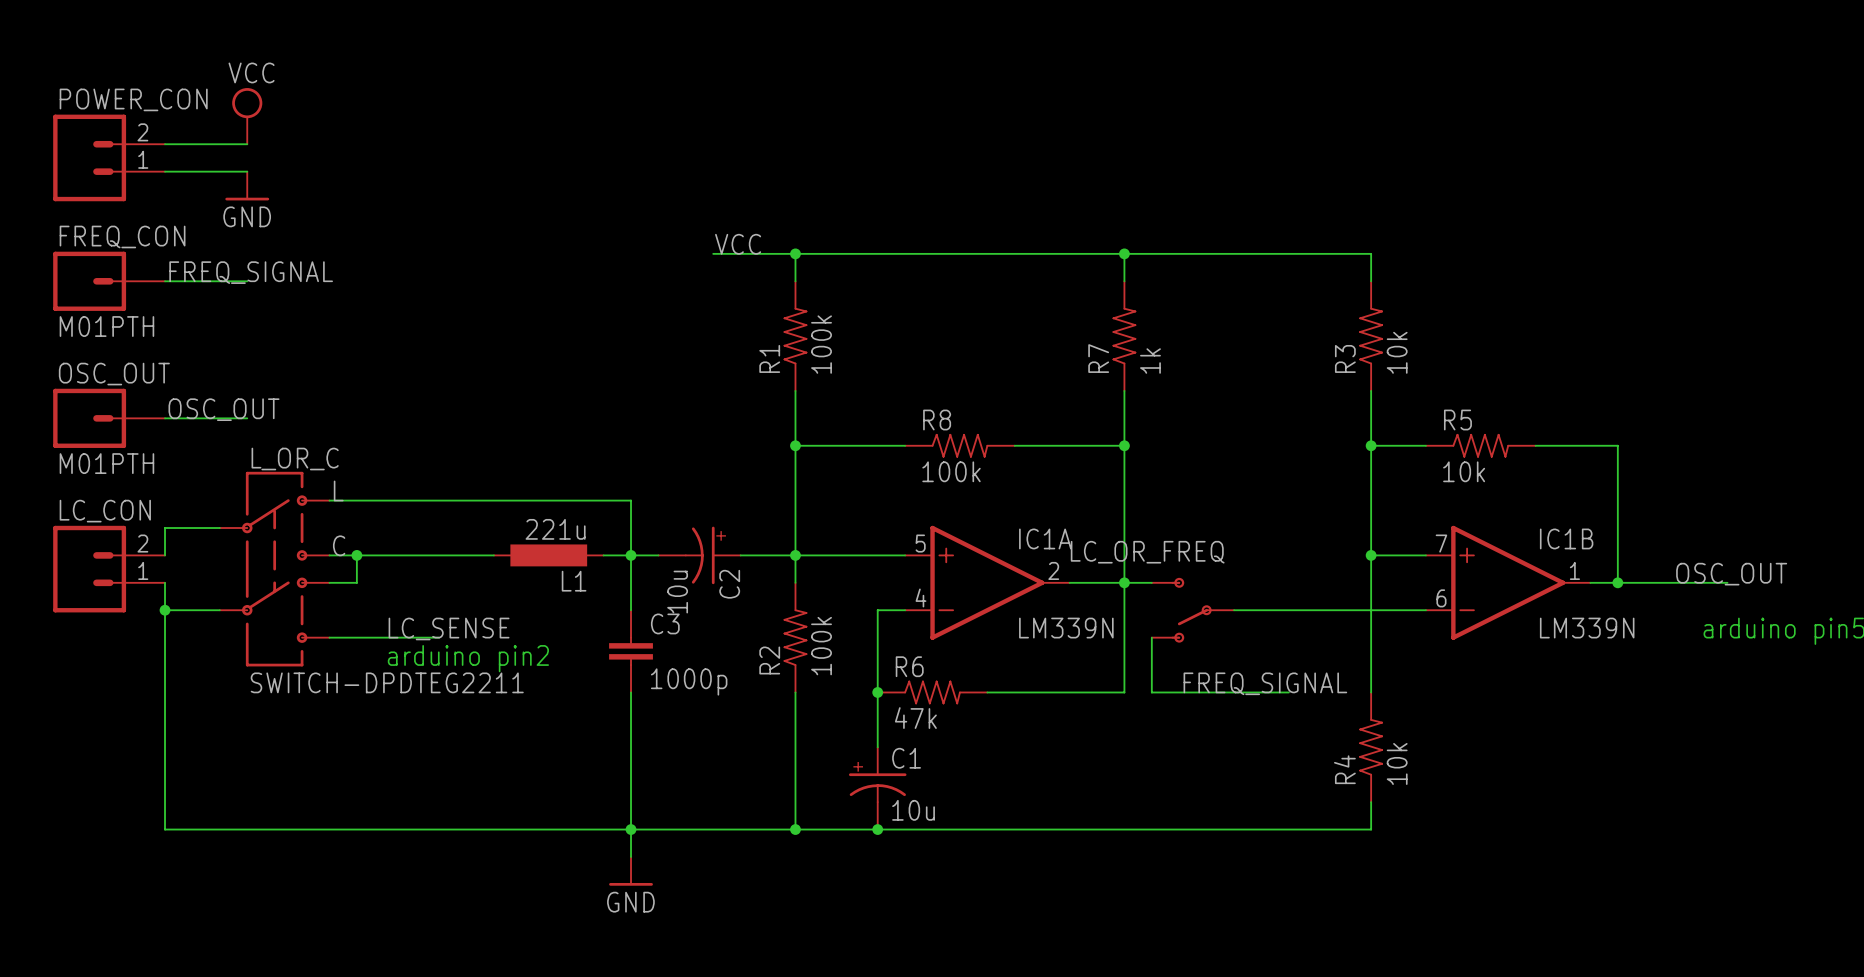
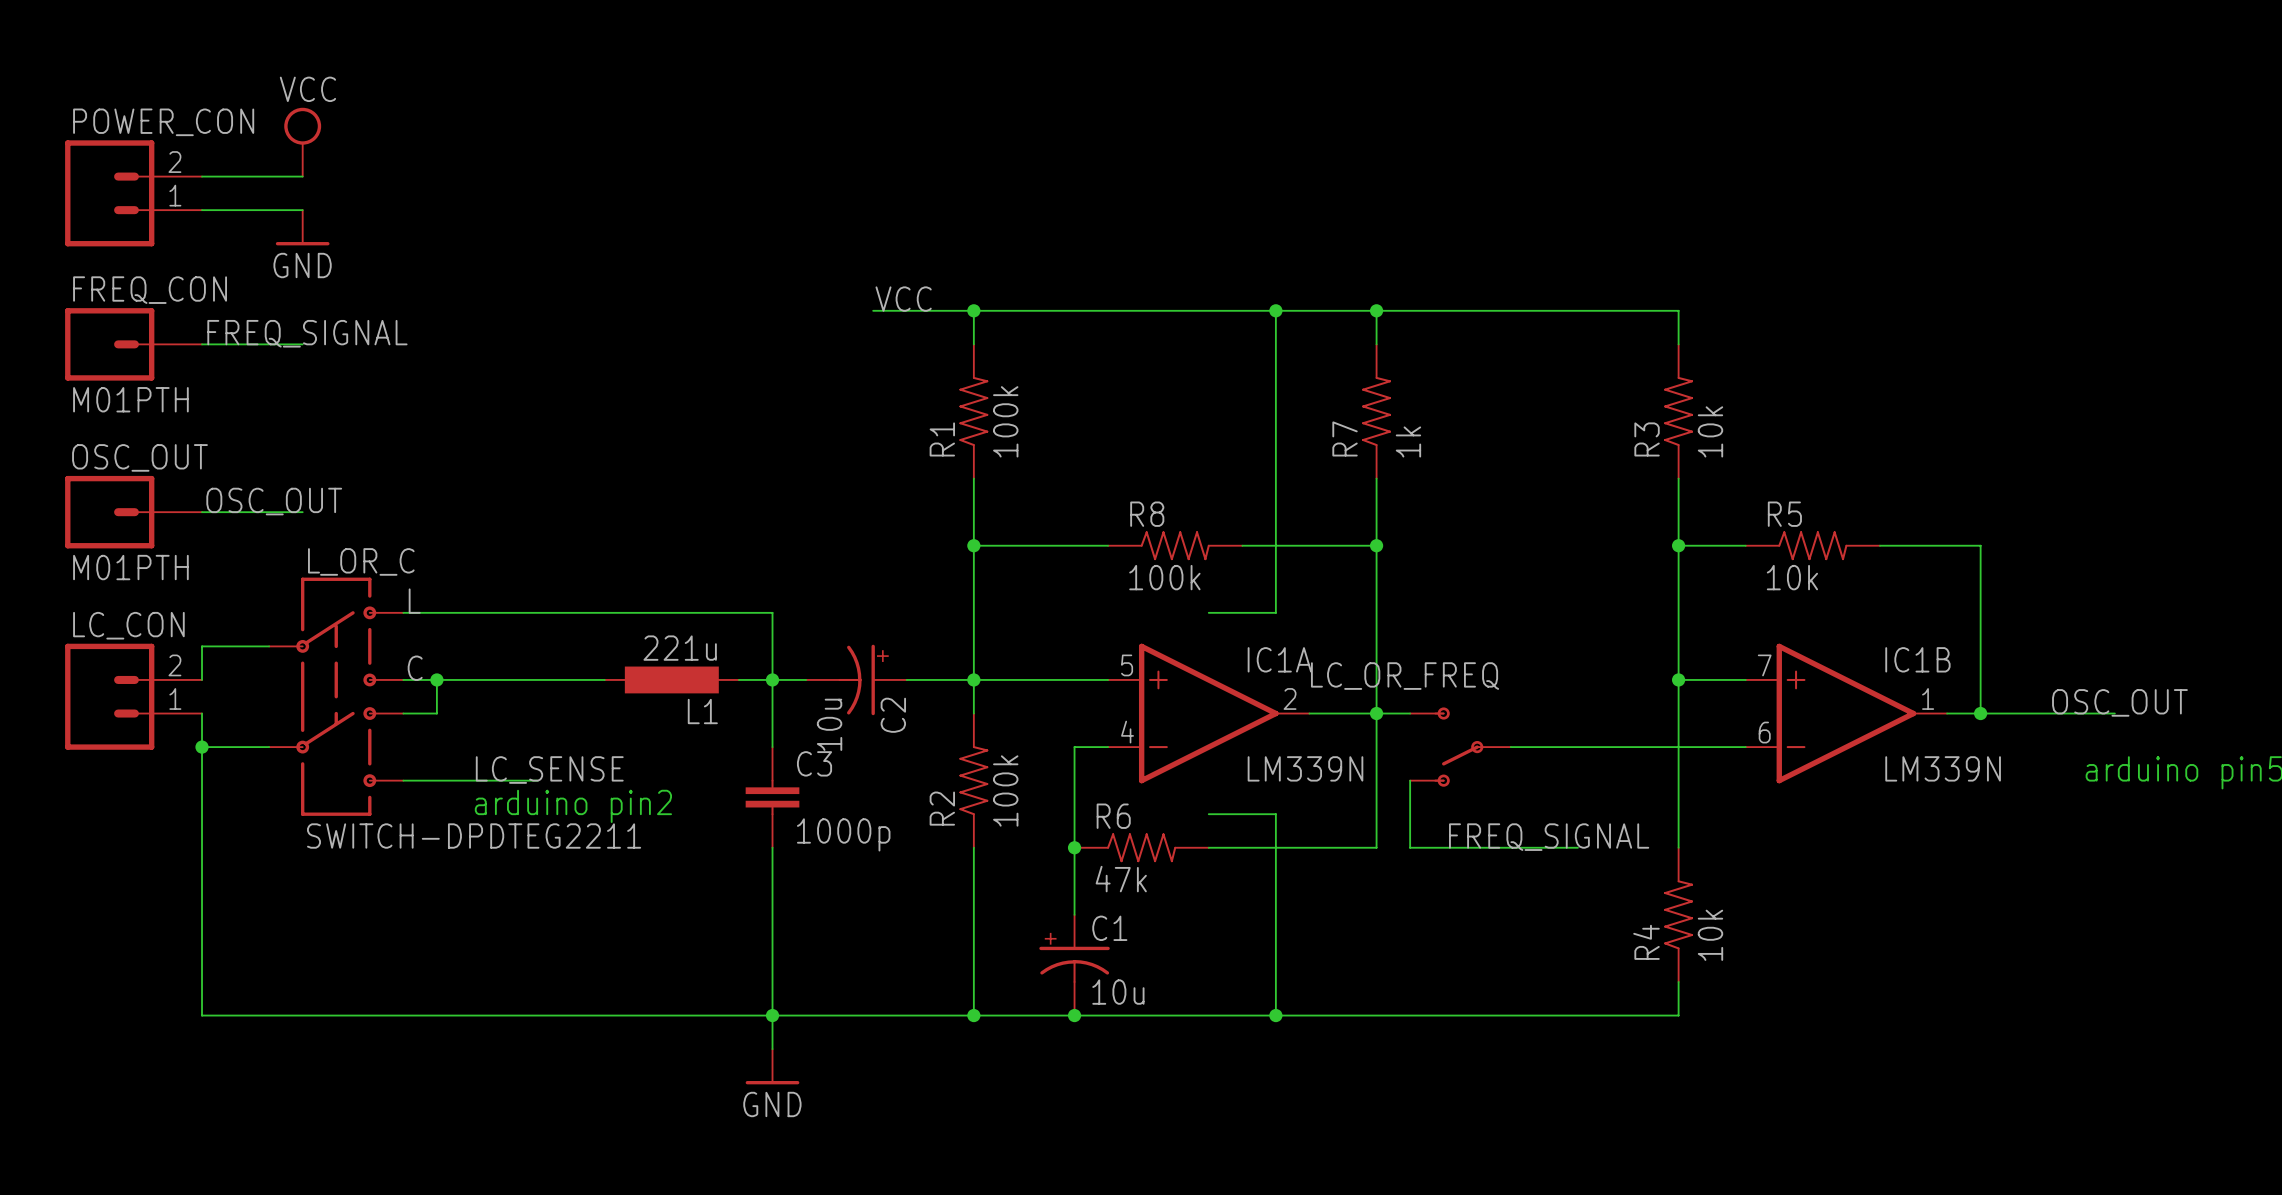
wire: none -> (1275, 310) (1275, 612) (1208, 612)
junction: none -> (1275, 310)
wire: none -> (1208, 814) (1275, 814) (1275, 1015)
junction: none -> (1275, 1015)

